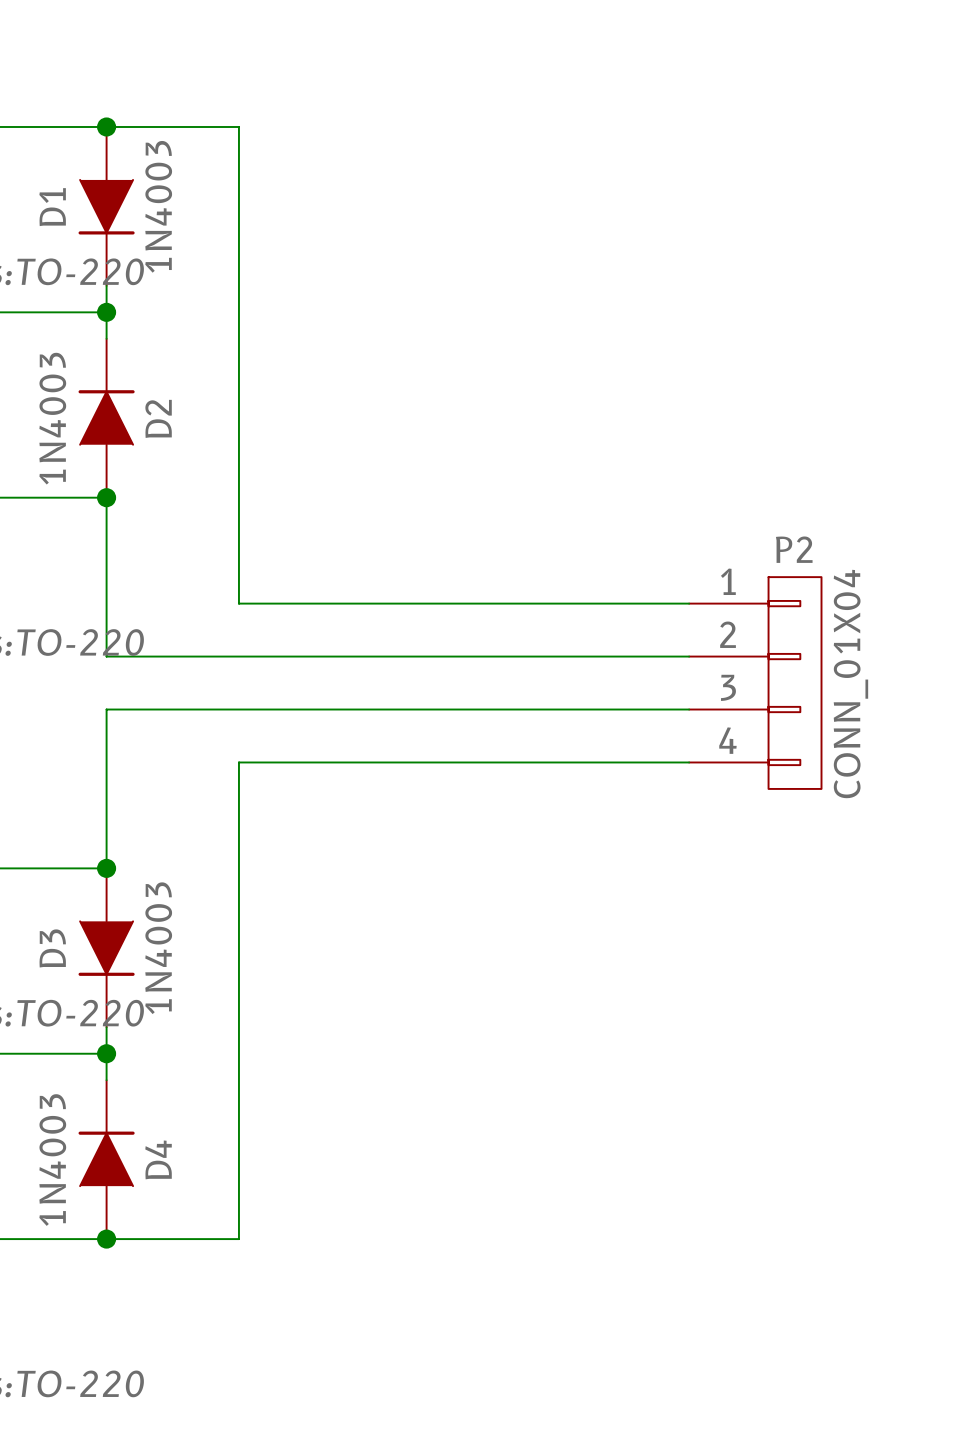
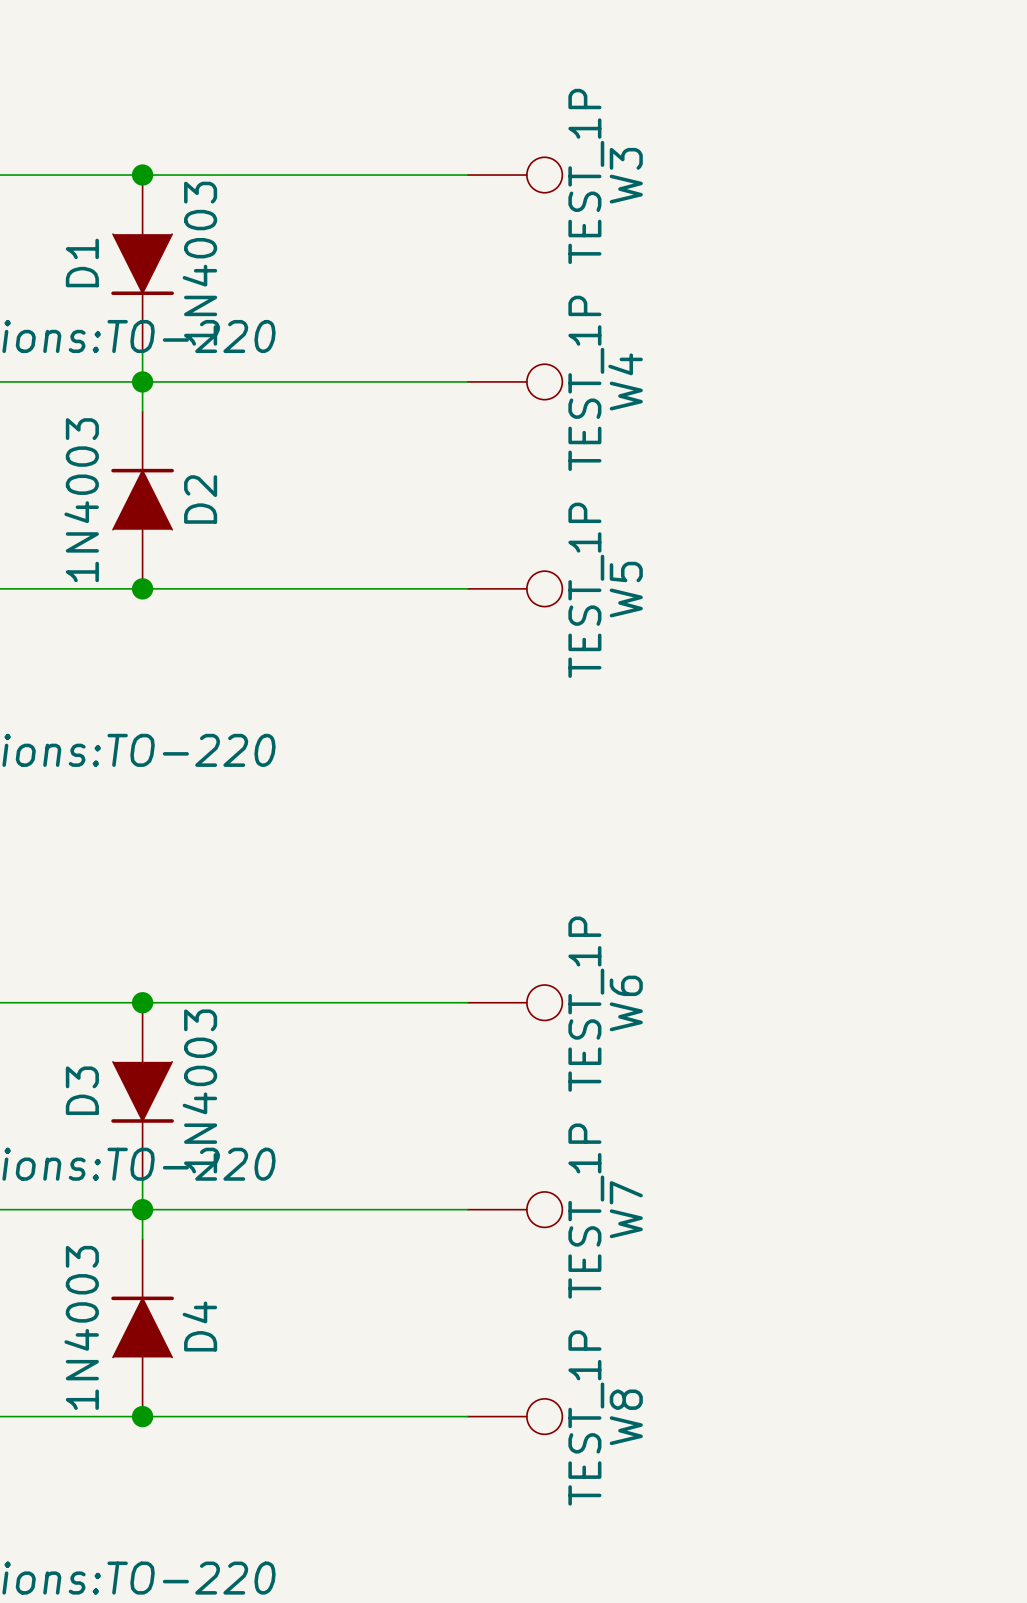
wire: (238, 126) (238, 603) (689, 603) -> (290, 175) (467, 175)
W3: none -> TEST_1P (515, 175)
wire: none -> (142, 381) (467, 381)
W4: none -> TEST_1P (515, 381)
wire: (106, 497) (106, 656) (689, 656) -> (142, 588) (467, 588)
W5: none -> TEST_1P (515, 588)
P2: CONN_01X04 (755, 683) -> none
wire: (689, 709) (106, 709) (106, 868) -> (467, 1002) (142, 1002)
wire: (689, 762) (238, 762) (238, 1239) -> (467, 1416) (290, 1416)
W6: none -> TEST_1P (515, 1002)
wire: none -> (142, 1209) (467, 1209)
W7: none -> TEST_1P (515, 1209)
W8: none -> TEST_1P (515, 1416)

